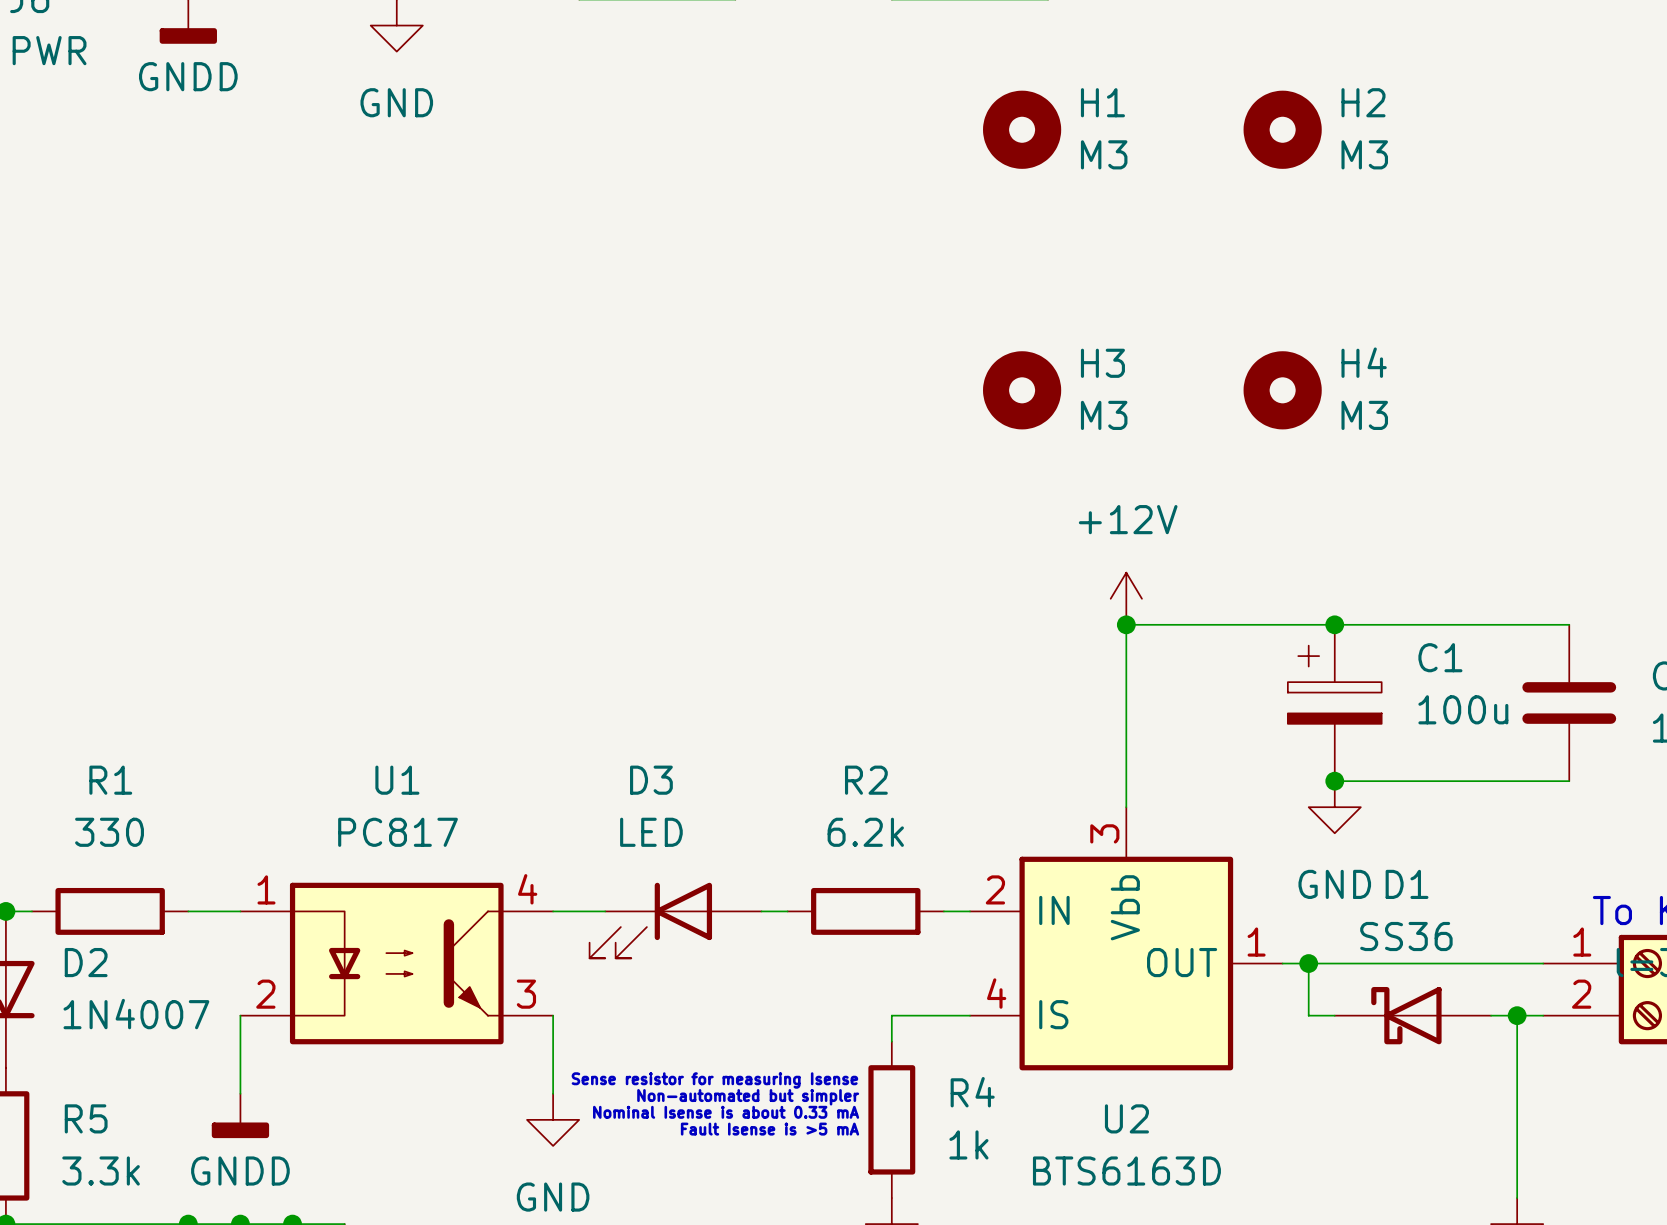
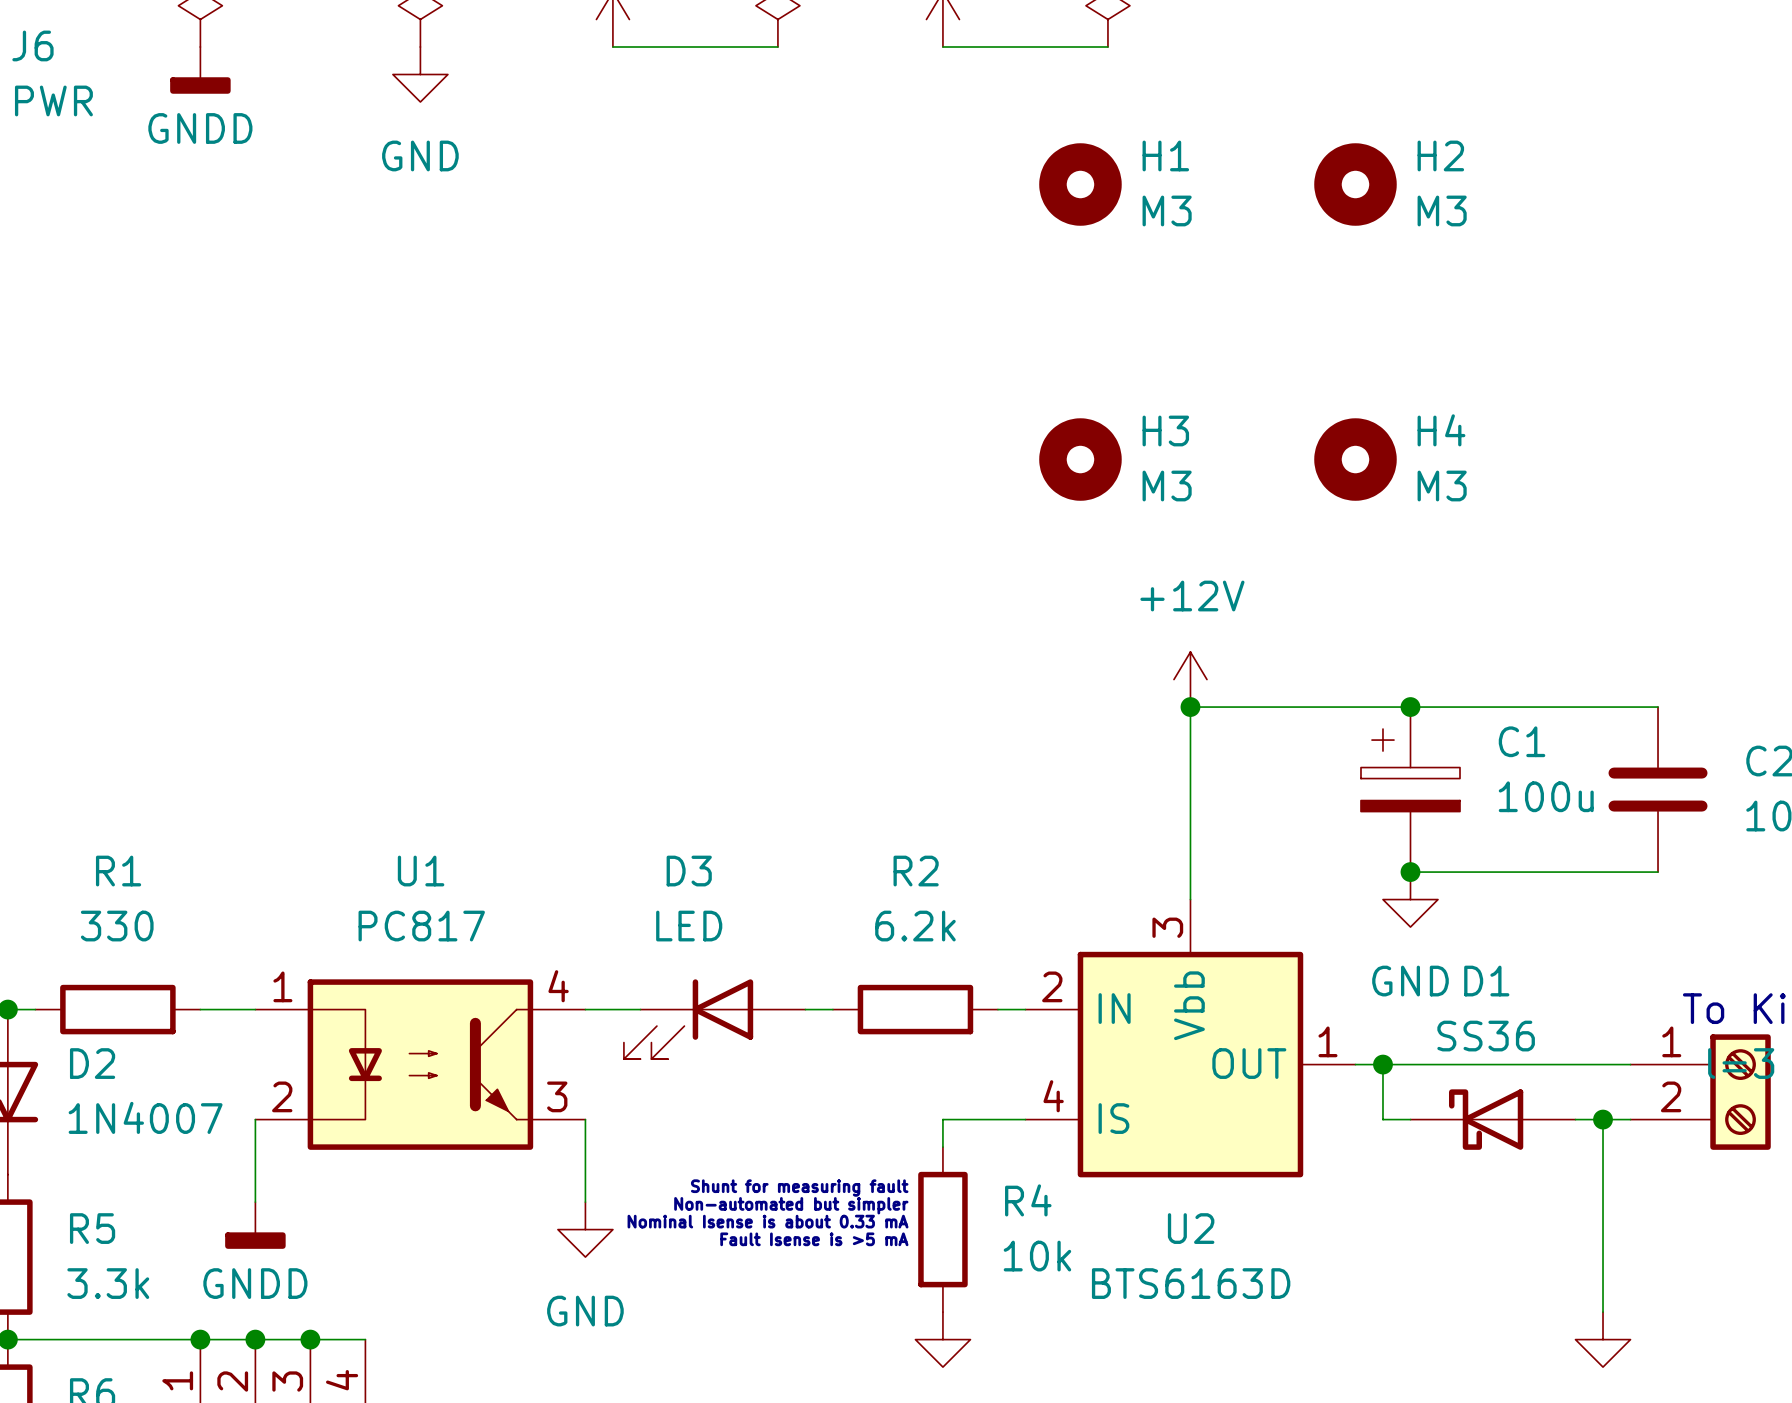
text: Sense resistor for measuring Isense (714, 1080) -> Shunt for measuring fault (799, 1188)
R4 value: 1k (968, 1144) -> 10k (1037, 1256)

